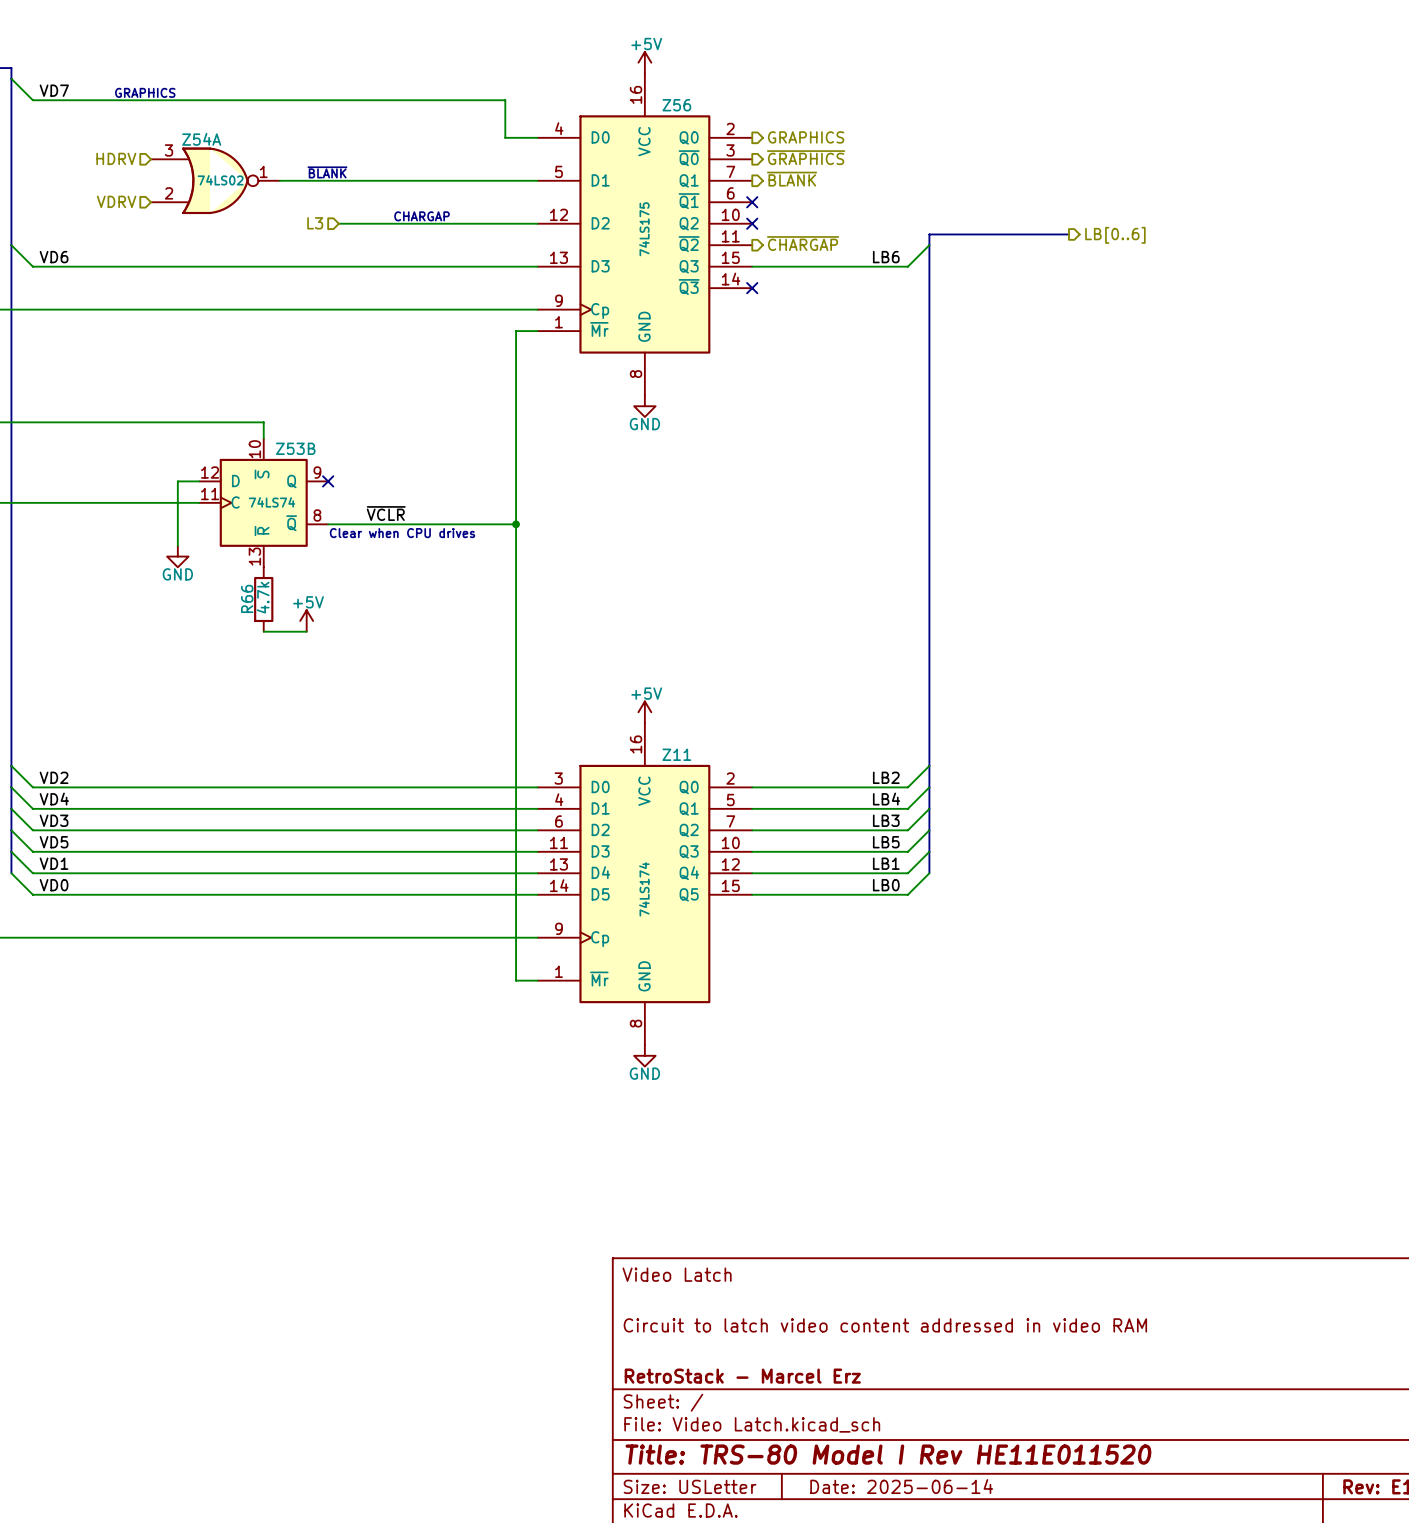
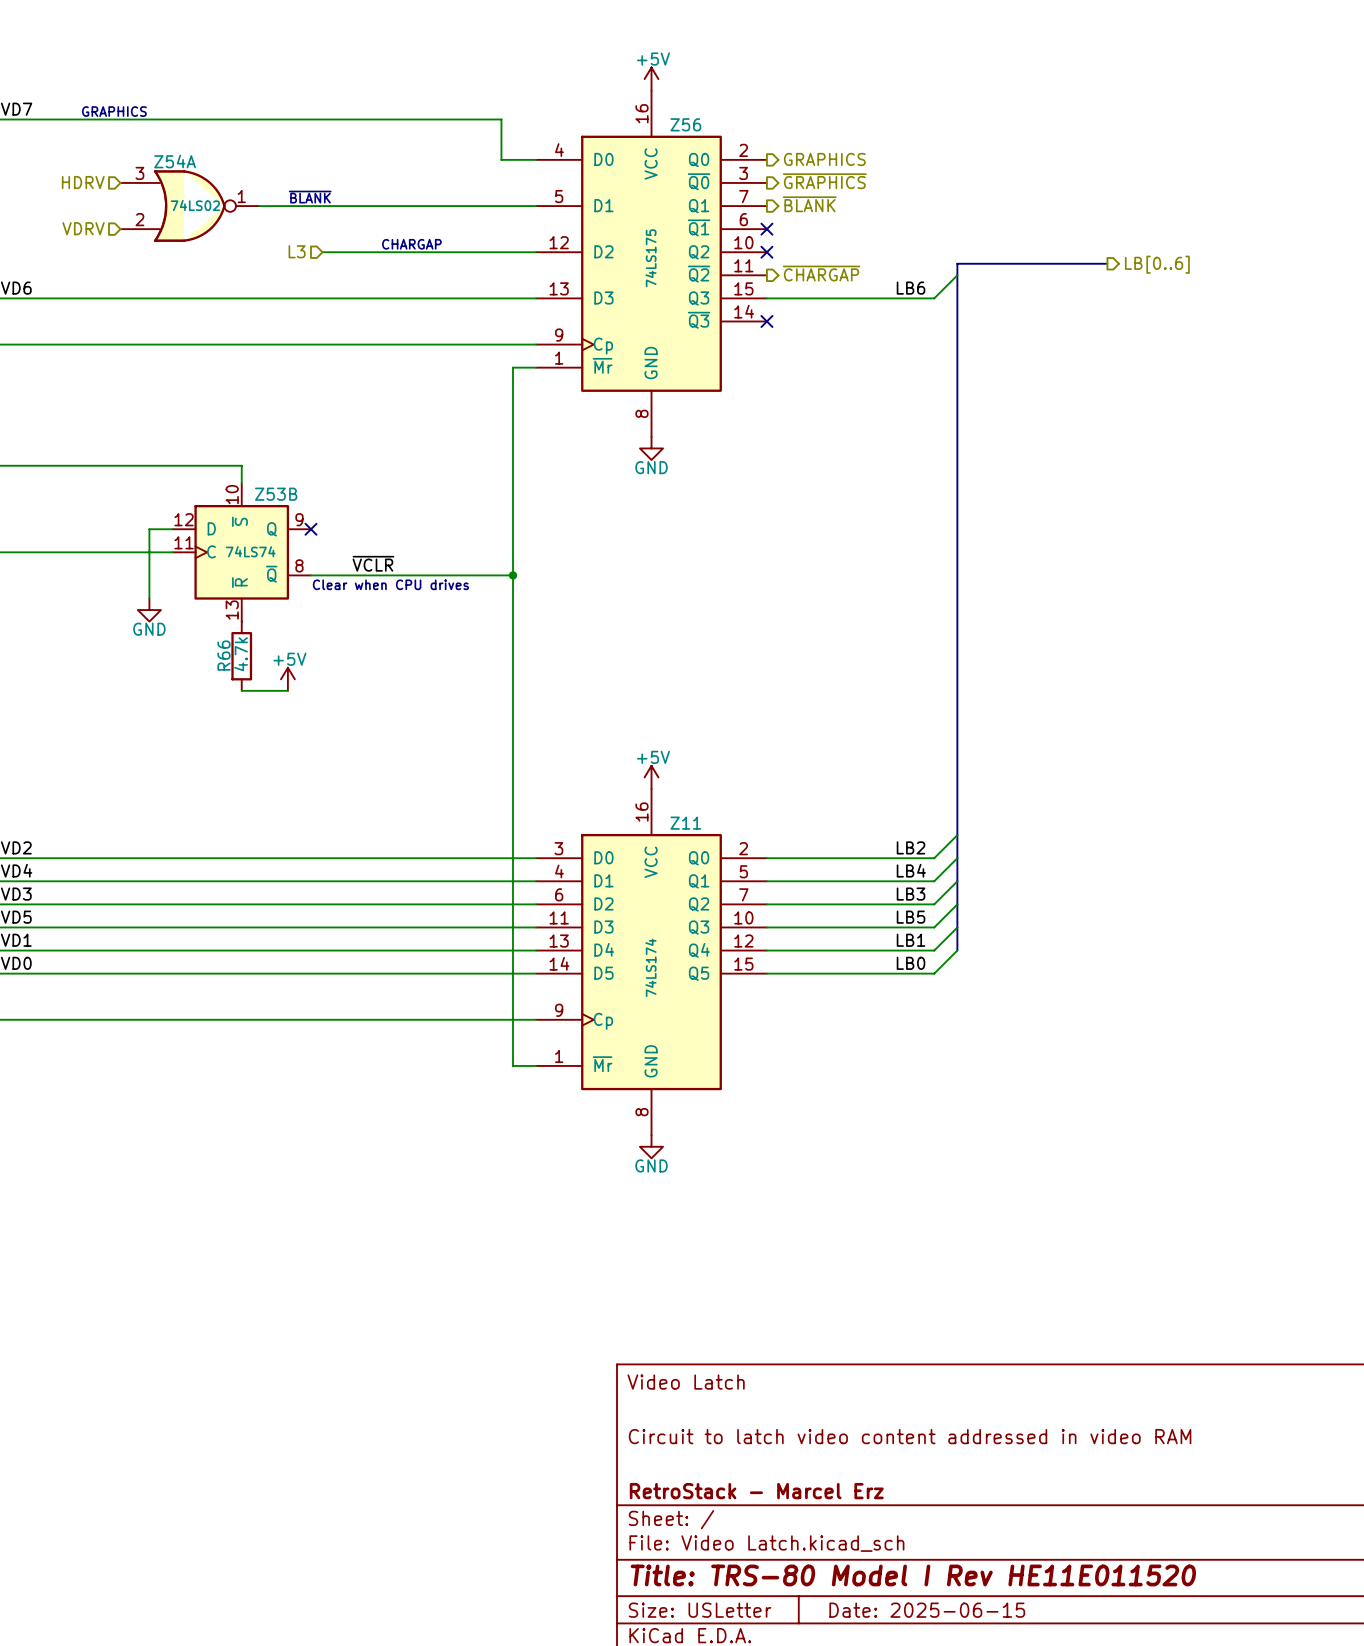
title block: Date: 2025-06-14 (901, 1486) -> Date: 2025-06-15 (927, 1610)

